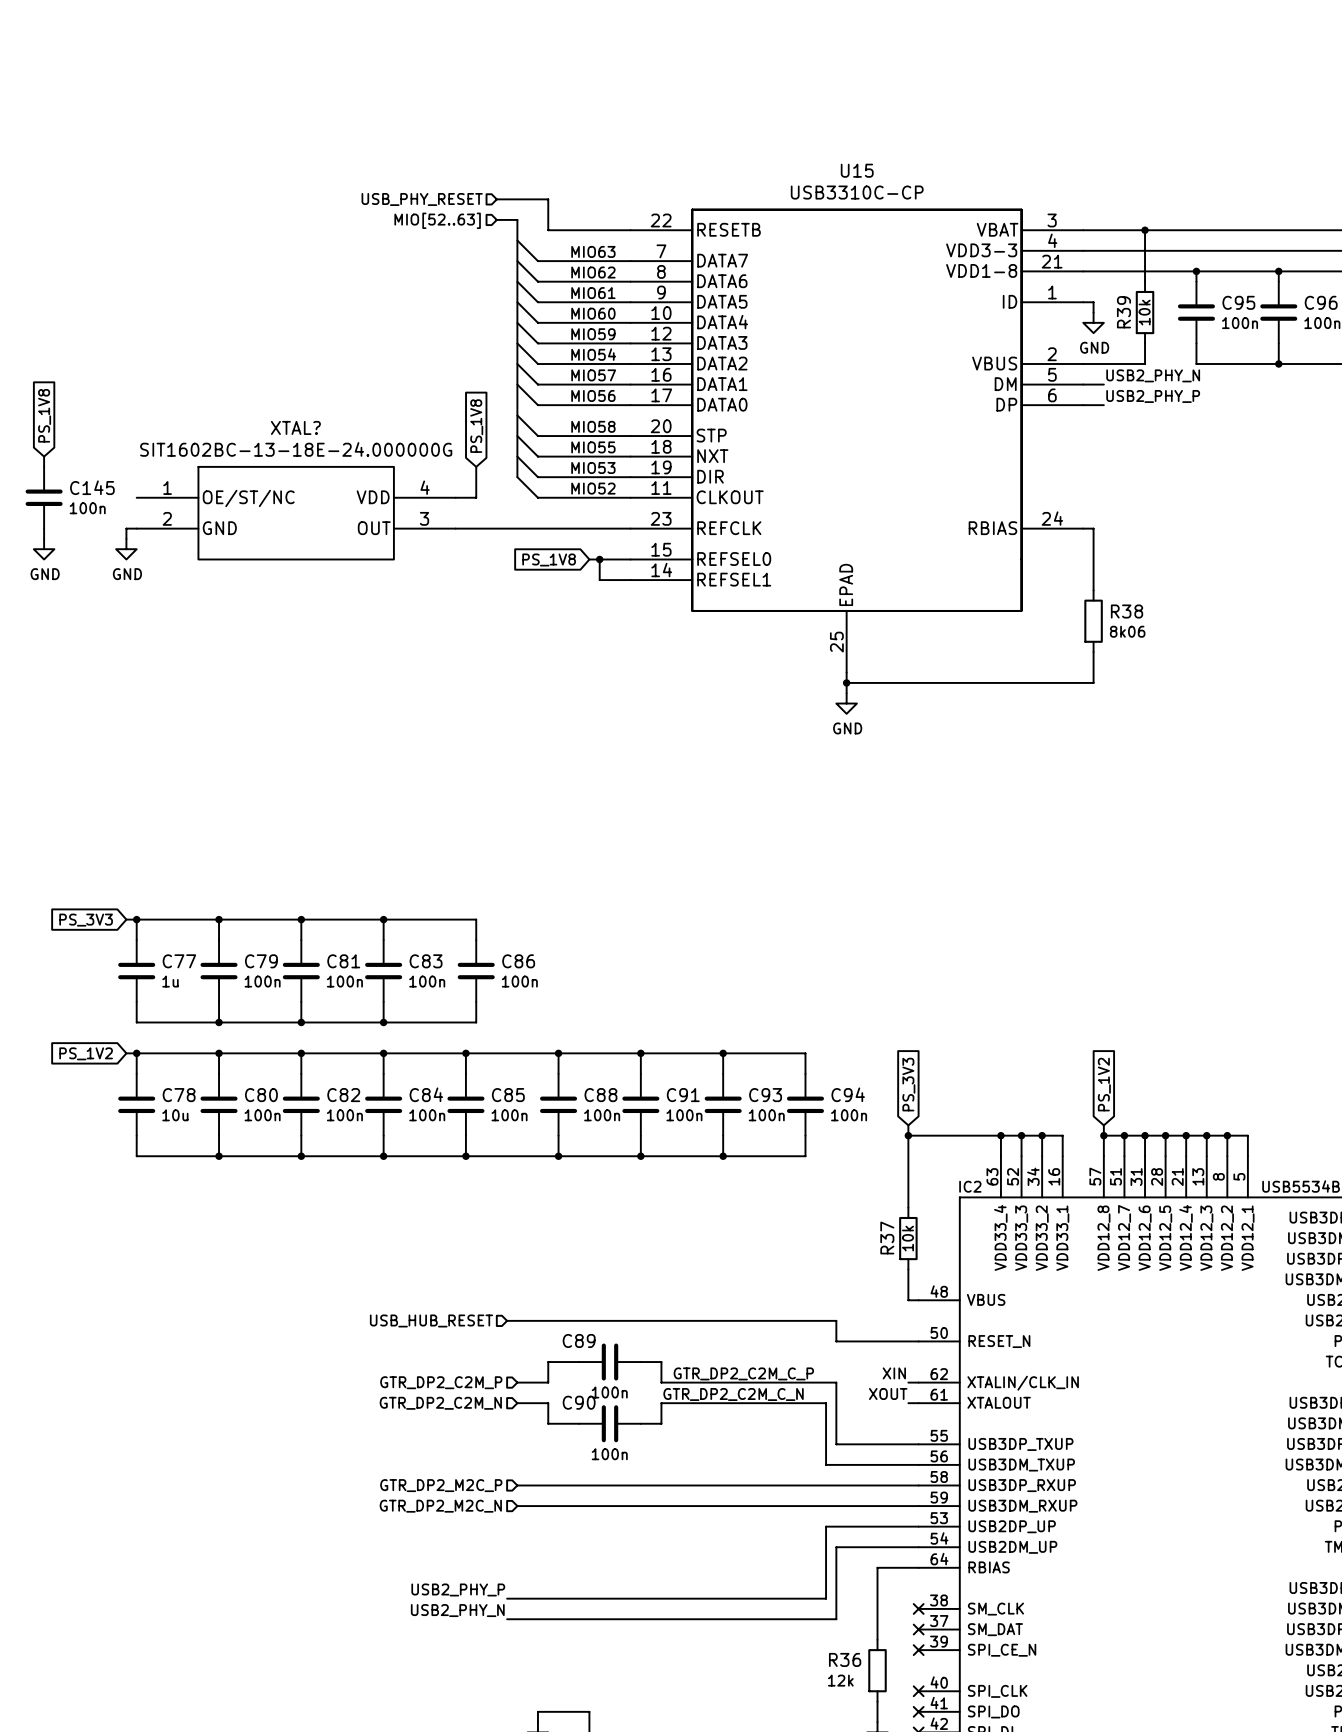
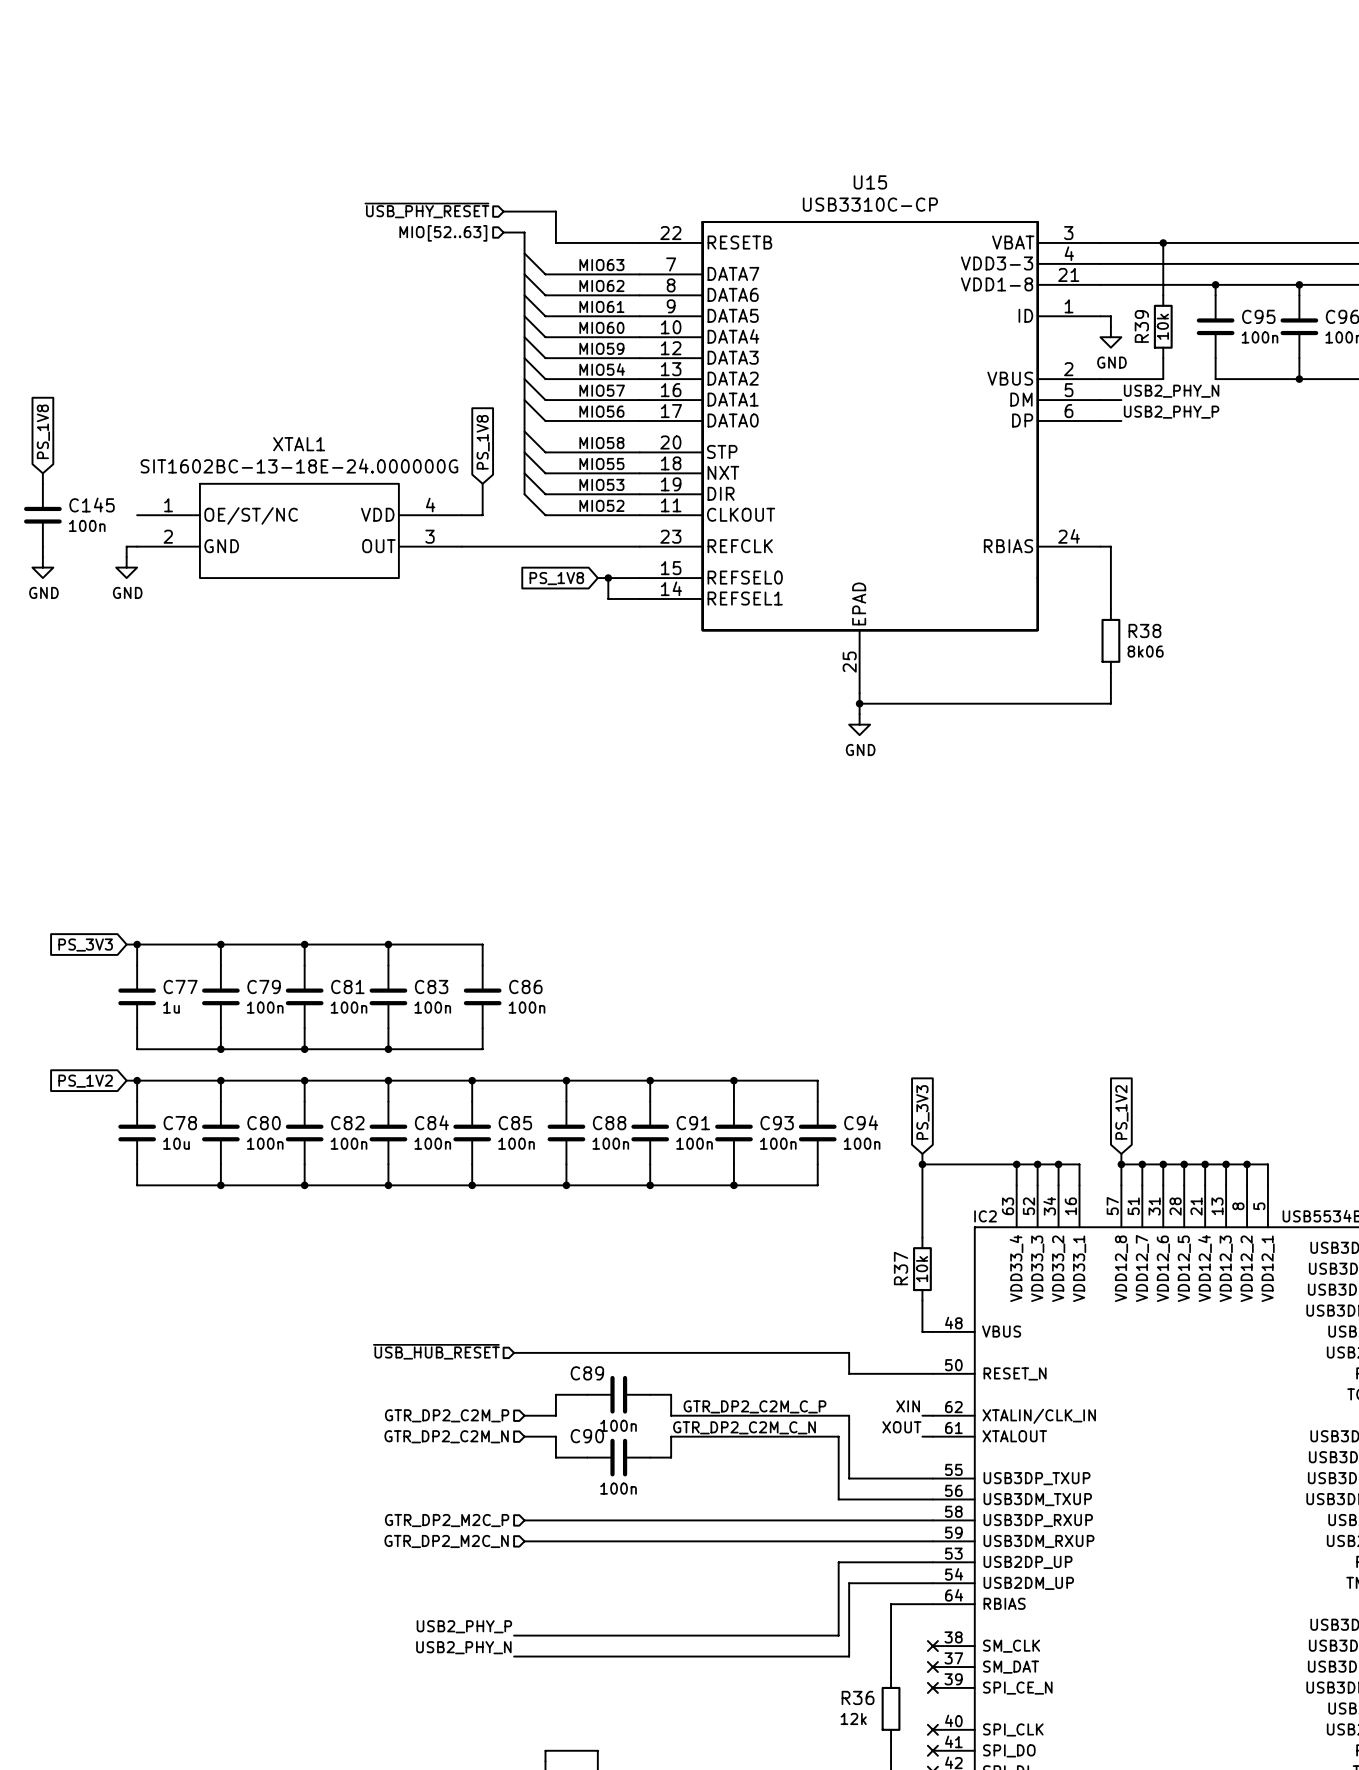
hierarchical label: USB_PHY_RESET (422, 199) -> ~{USB_PHY_RESET} (426, 210)
XTAL? name: XTAL? (295, 427) -> XTAL1 (299, 444)
hierarchical label: USB_HUB_RESET (431, 1320) -> ~{USB_HUB_RESET} (436, 1351)

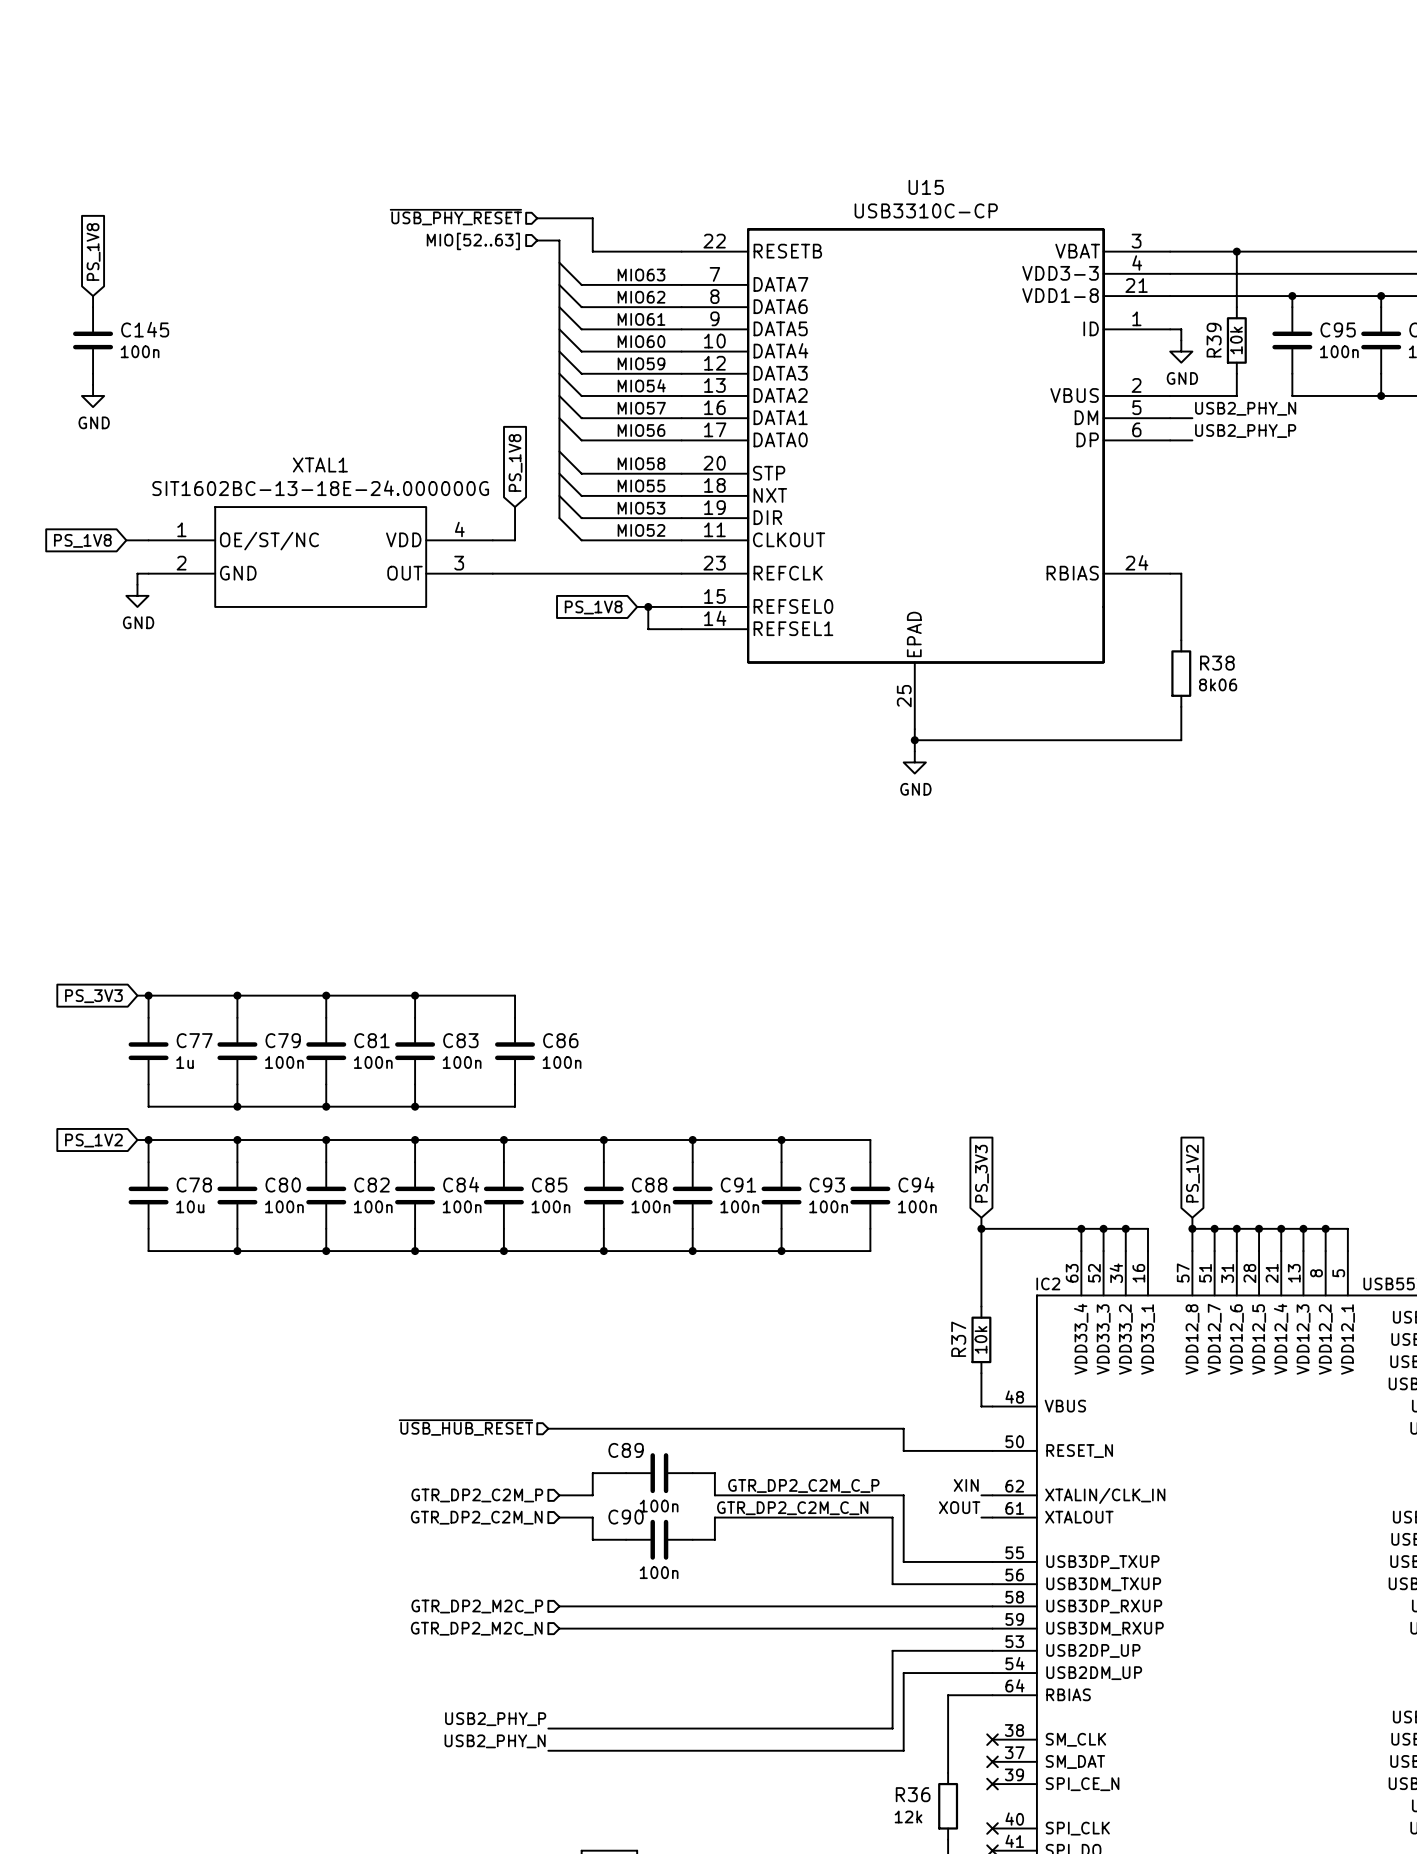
global label: none -> PS_1V8 (93, 252)
wire: none -> (93, 296) (93, 307)
global label rotation: 0° (43, 431) -> 90° counterclockwise (82, 540)
global label position: PS_1V8 (43, 431) -> PS_1V8 (82, 540)
wire: (42, 473) (42, 483) -> (93, 373) (93, 384)
C145 position: (42, 515) -> (93, 340)
wire: none -> (126, 540) (148, 540)
wire: (42, 546) (42, 557) -> none
power symbol position: GND (42, 567) -> GND (93, 395)

